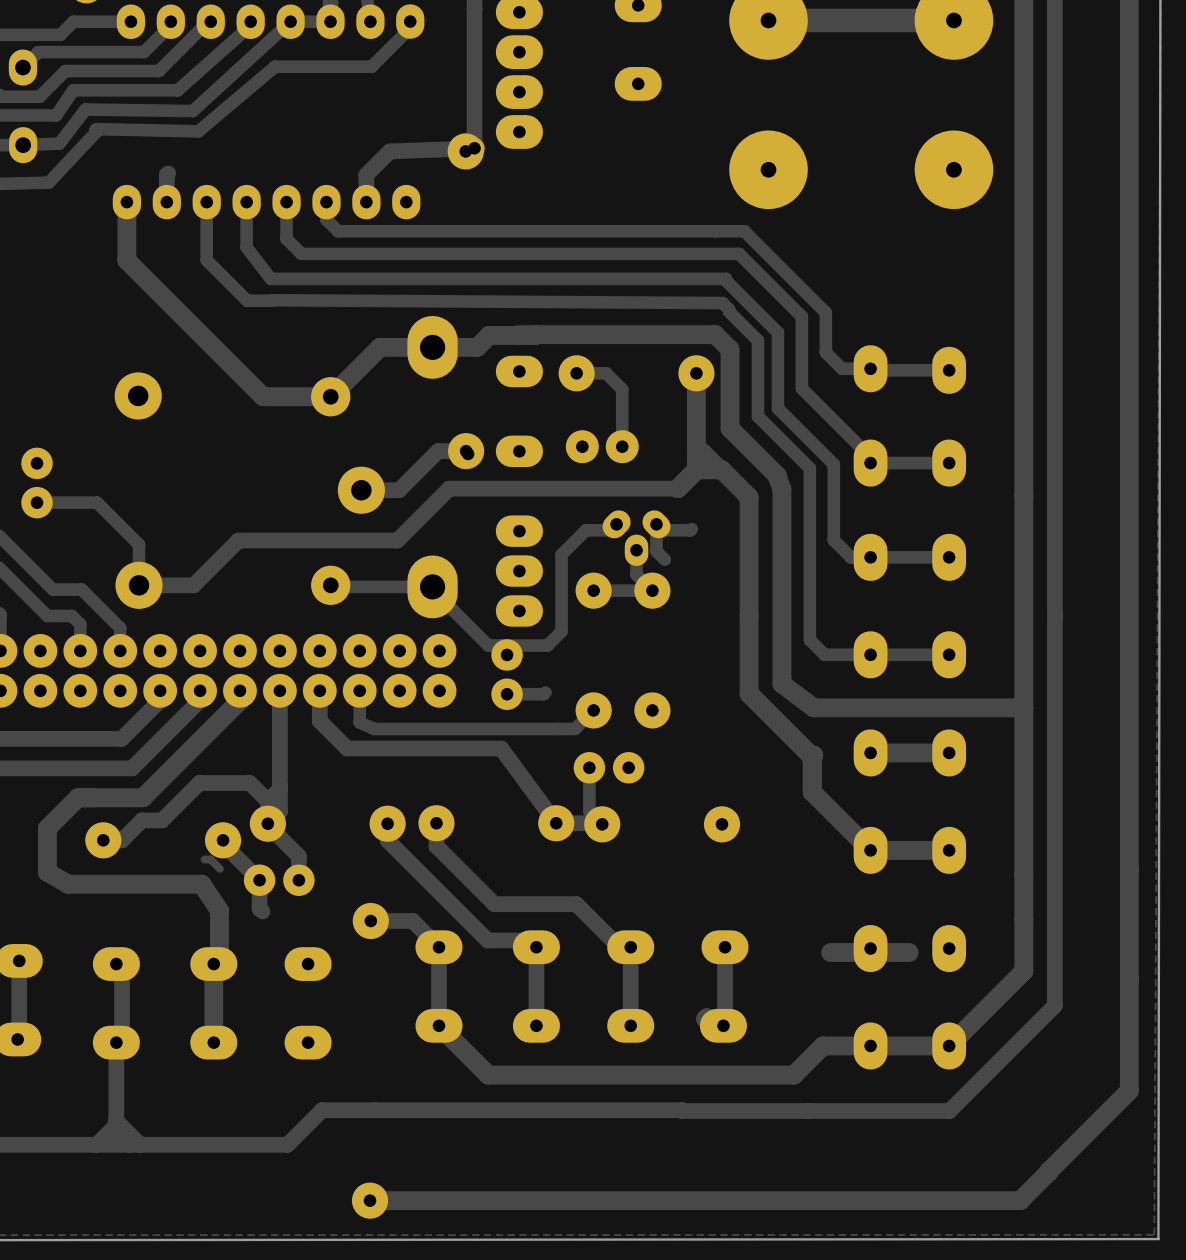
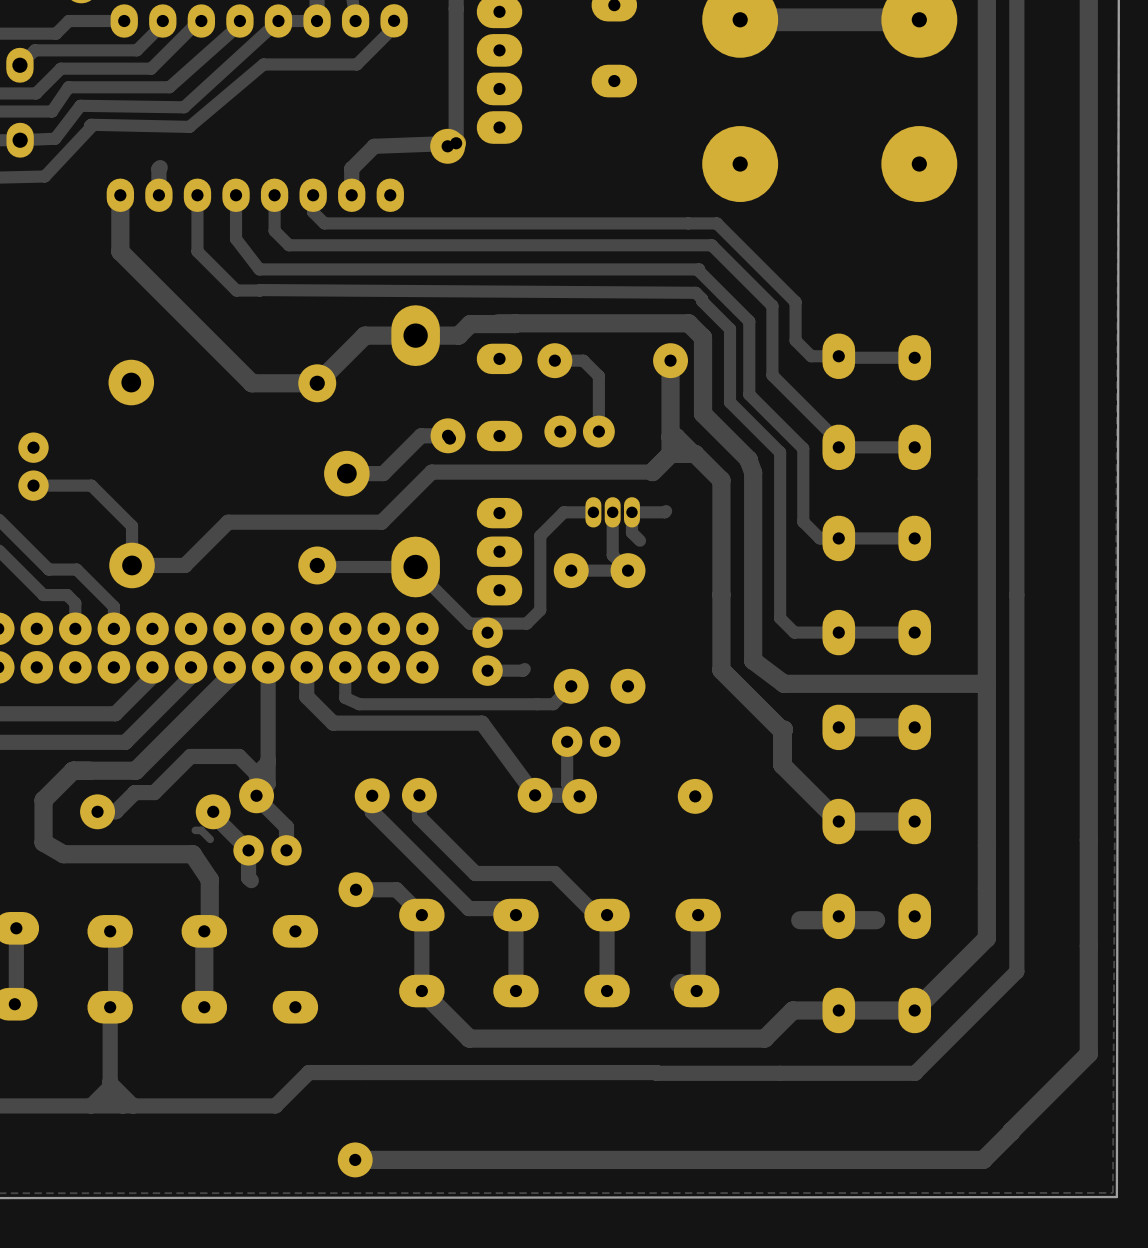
part footprint: [602, 510, 671, 566] -> [585, 497, 640, 528]

